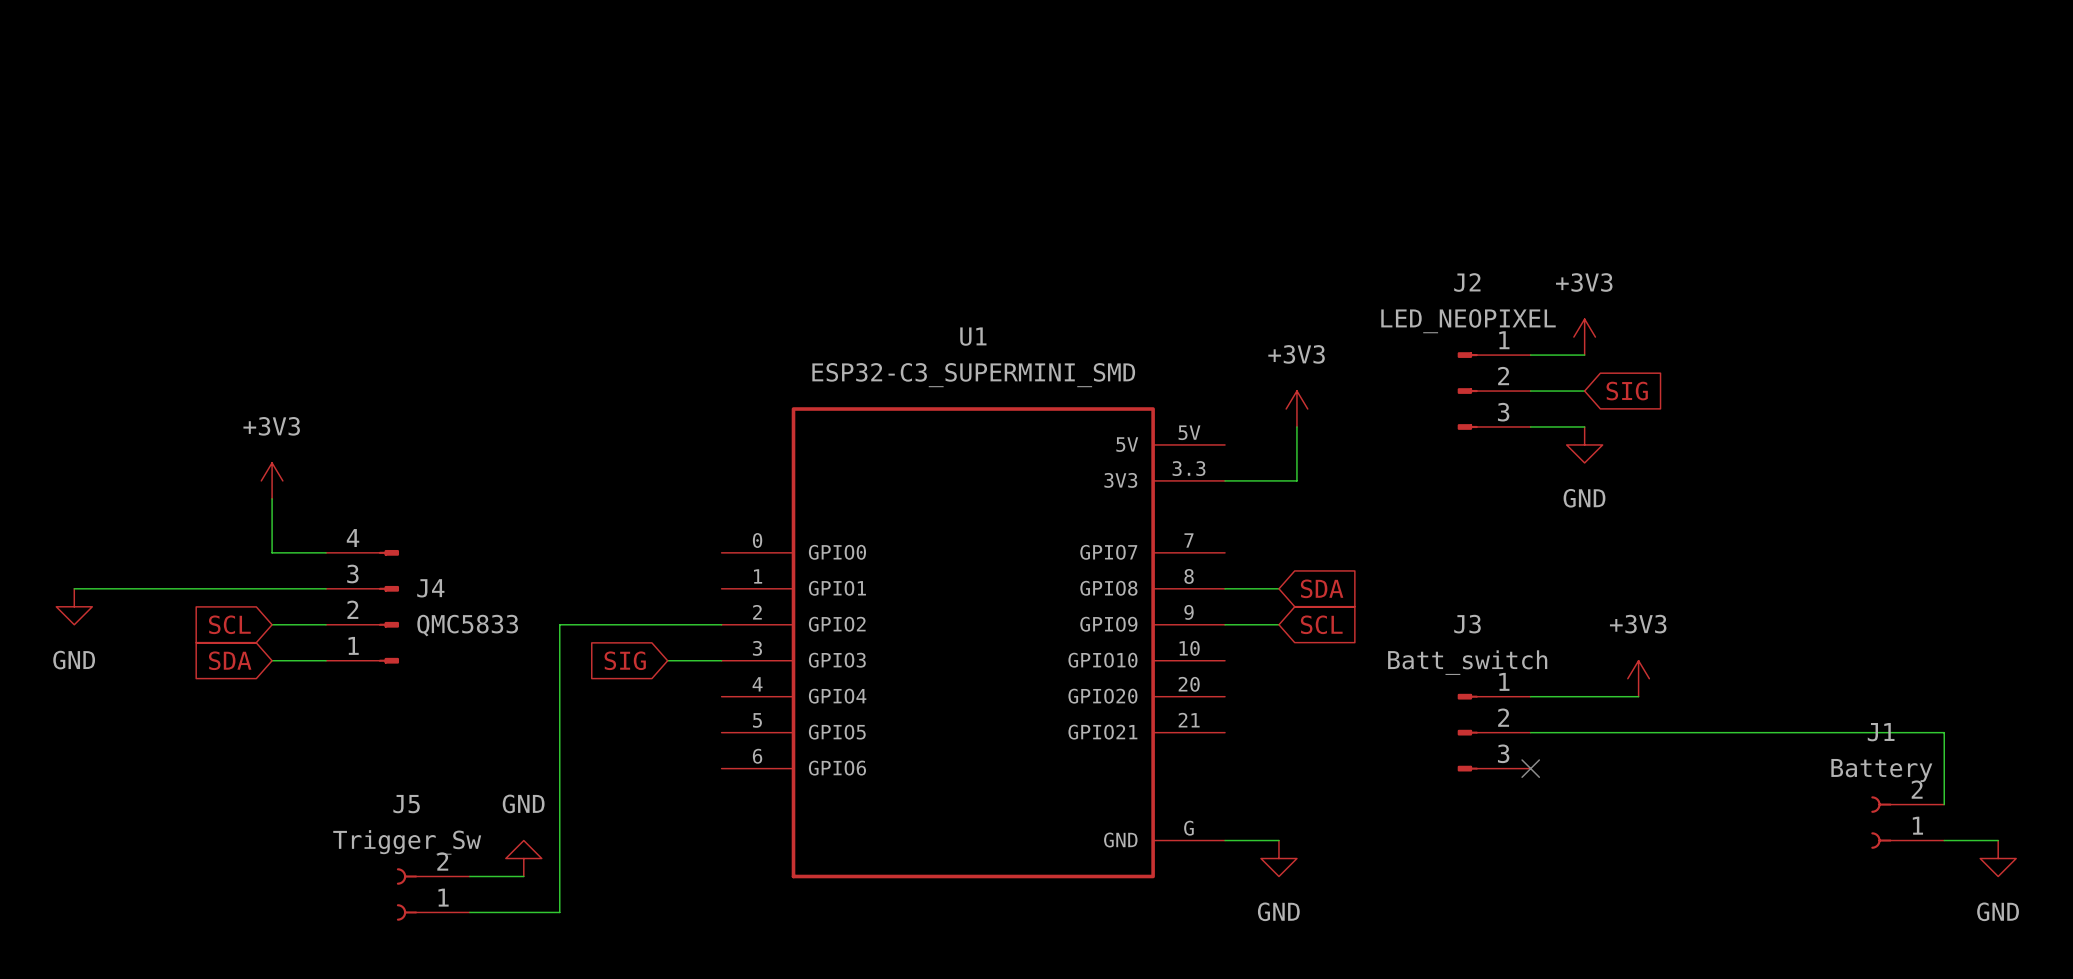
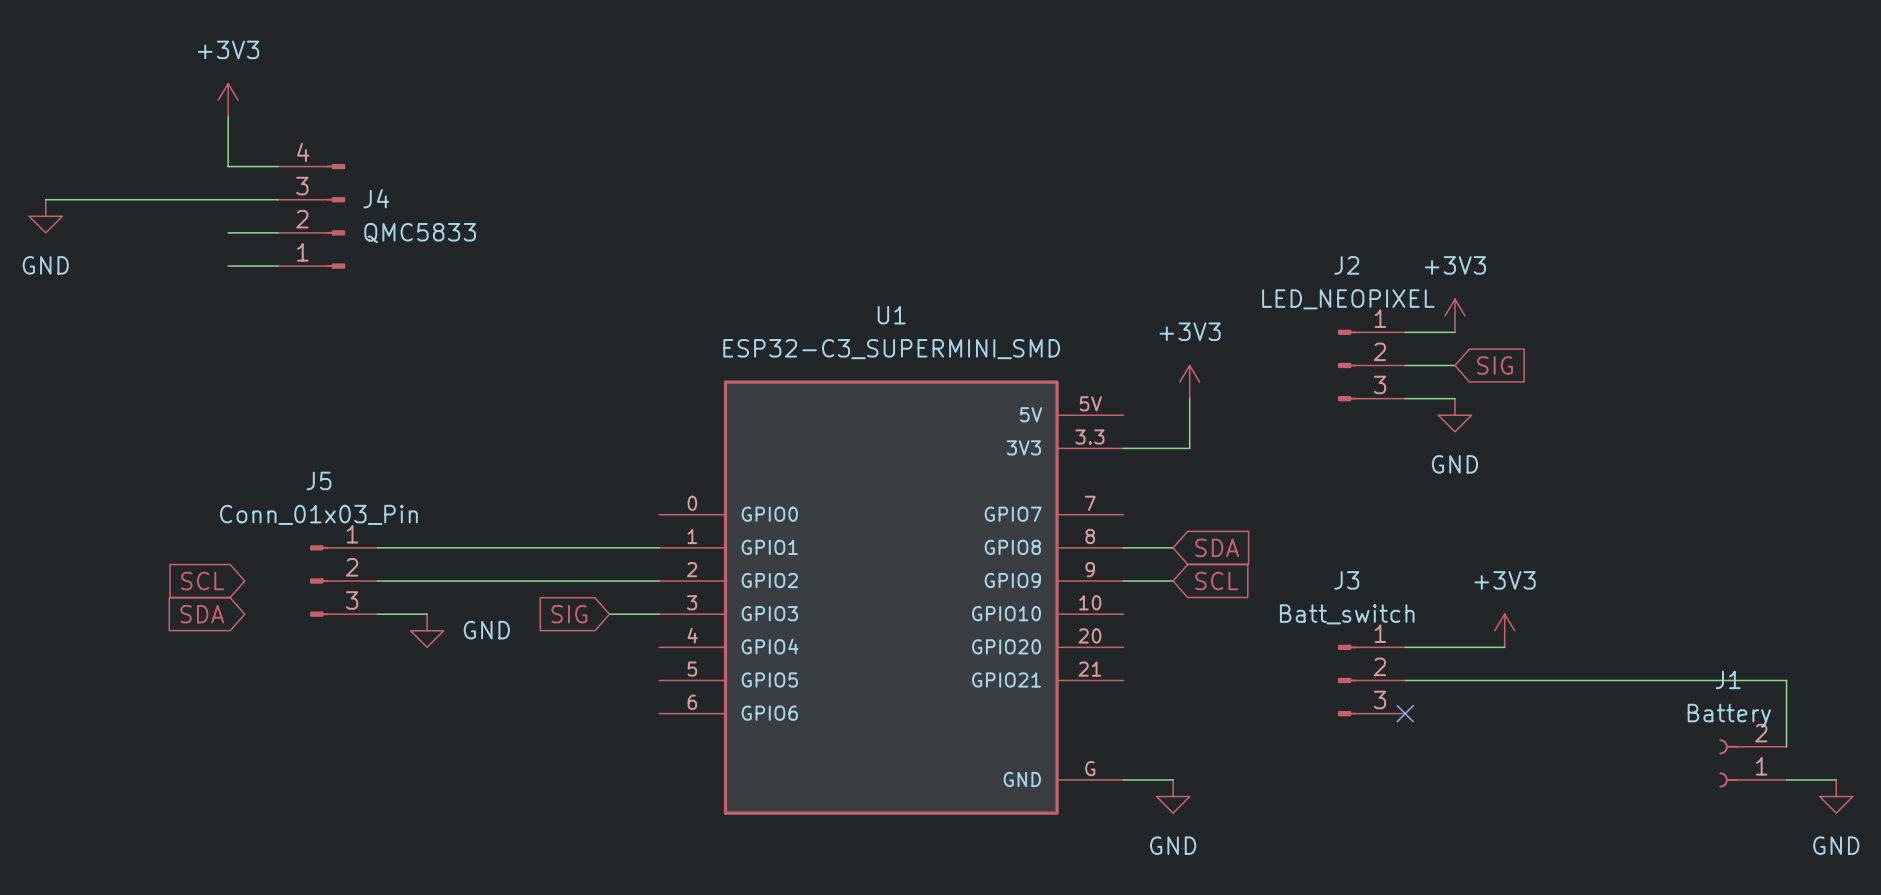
power symbol: none -> +3V3 (228, 100)
wire: none -> (228, 116) (228, 166) (277, 166)
wire: none -> (45, 199) (277, 199)
power symbol: none -> GND (45, 216)
wire: none -> (228, 232) (277, 232)
power symbol: +3V3 (272, 480) -> none
wire: (272, 498) (272, 552) (326, 552) -> none
wire: (74, 588) (326, 588) -> none
wire: none -> (377, 547) (659, 547)
power symbol: GND (74, 606) -> none
J4 position: (362, 606) -> (311, 216)
wire: (272, 624) (326, 624) -> (228, 266) (277, 266)
wire: (559, 624) (559, 912) (469, 912) -> (509, 581) (377, 581)
wire: (272, 660) (326, 660) -> (377, 614) (427, 614)
power symbol text position: GND (523, 803) -> GND (486, 630)
J5 value: Trigger_Sw (407, 842) -> Conn_01x03_Pin (318, 514)
power symbol rotation: 0° (523, 858) -> 180° (427, 630)
power symbol position: GND (523, 858) -> GND (427, 630)
J5 symbol: [396, 868, 470, 921] -> [310, 545, 378, 617]
wire: (469, 876) (523, 876) -> none

